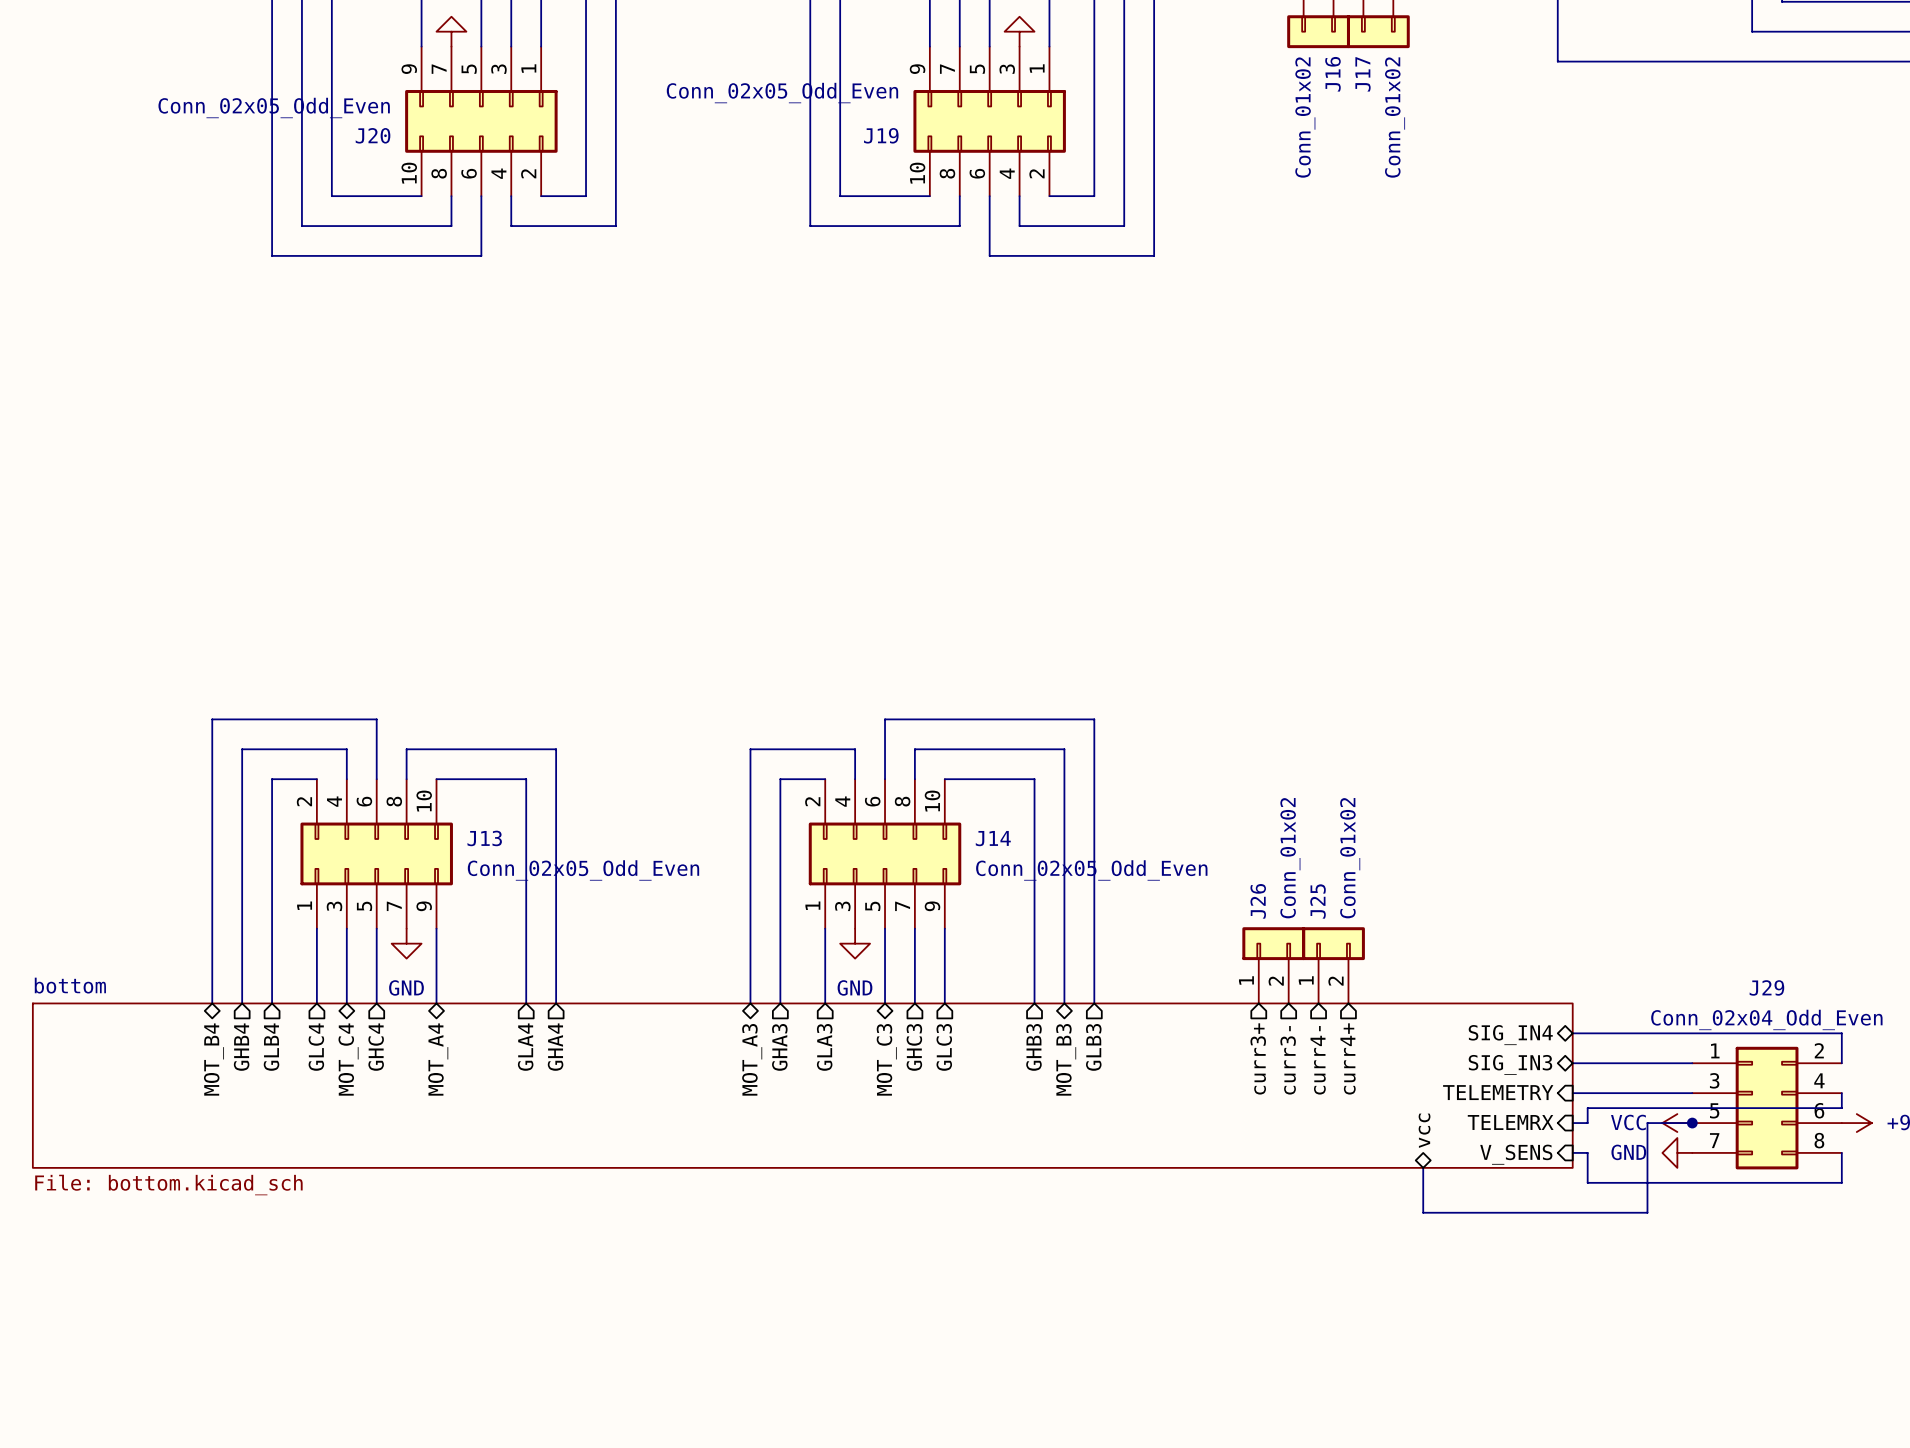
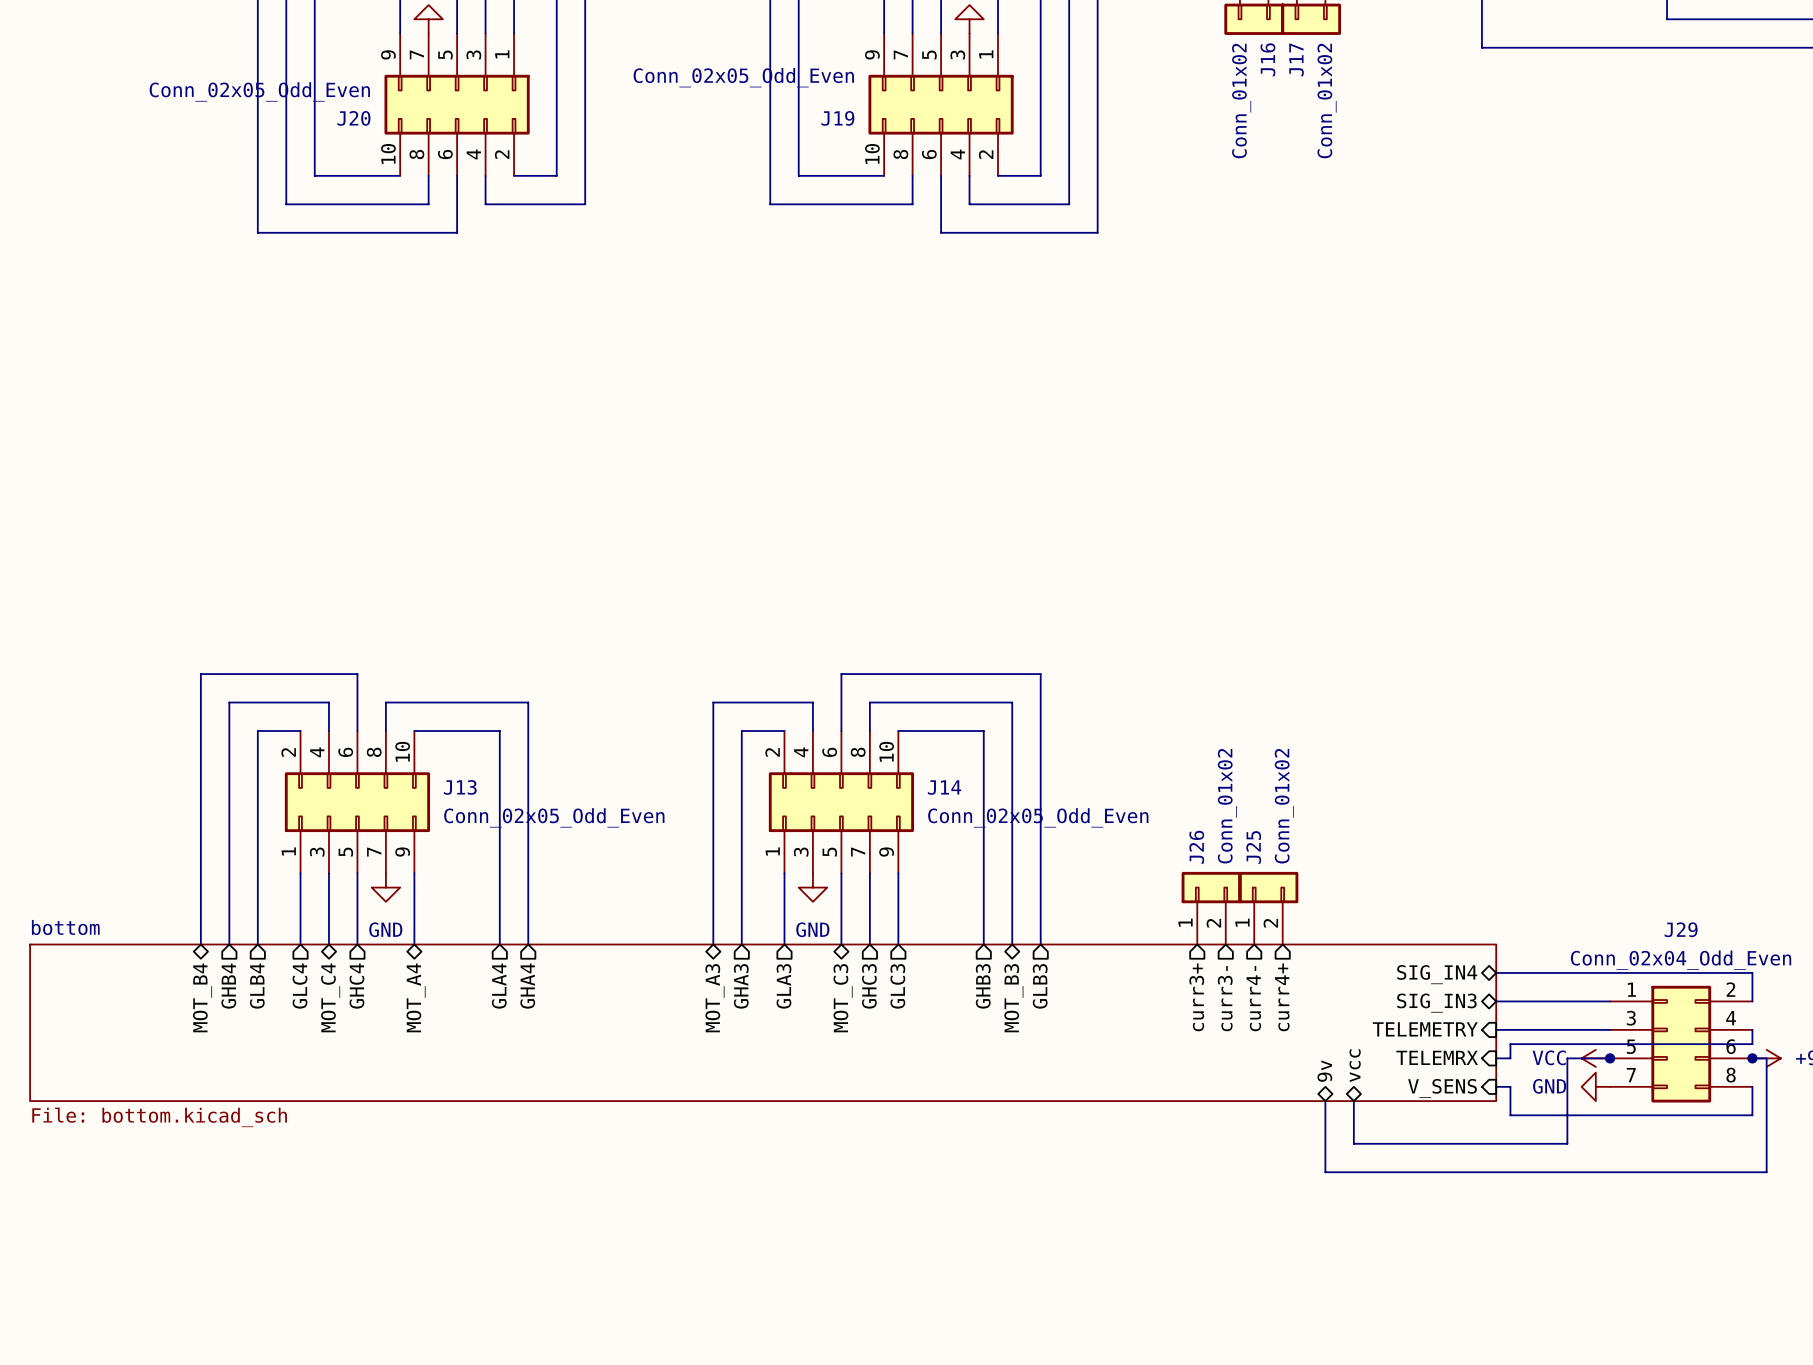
wire: none -> (1752, 1058) (1766, 1058) (1766, 1172) (1325, 1172) (1325, 1101)
junction: none -> (1752, 1058)
sheet pin: none -> 9v (1324, 1071)

